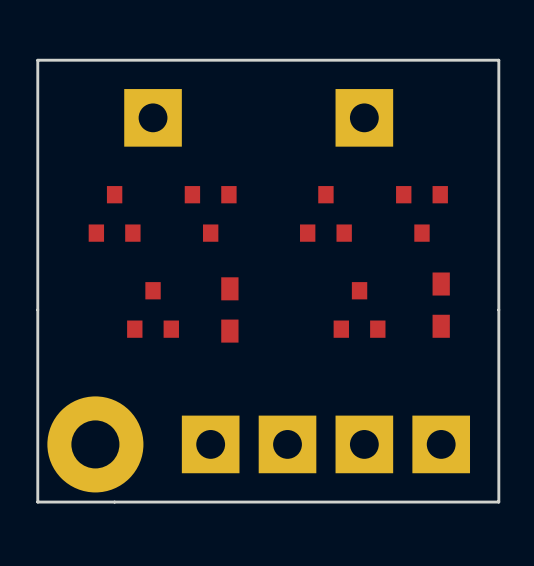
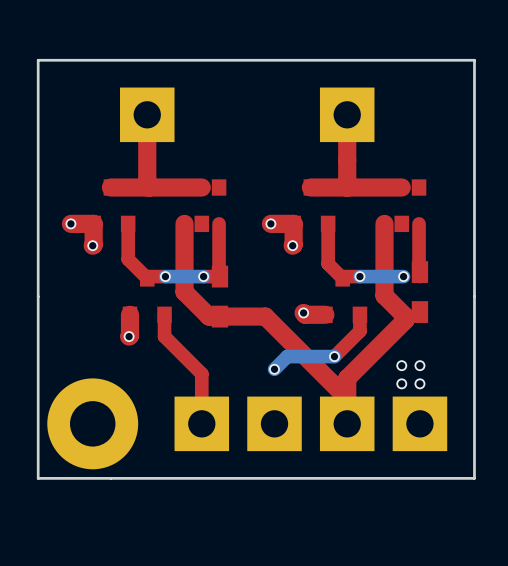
top track: none -> (147, 114) (147, 185) (149, 187)
top track: none -> (347, 114) (347, 187)
top track: none -> (201, 187) (110, 187)
top track: none -> (401, 187) (310, 187)
top track: none -> (70, 223) (93, 223) (92, 245)
via: none -> (70, 223)
top track: none -> (128, 223) (128, 259) (147, 278) (149, 276) (165, 276)
top track: none -> (184, 223) (184, 292) (209, 316) (265, 316) (347, 398)
top track: none -> (219, 223) (219, 276) (203, 276)
top track: none -> (270, 223) (293, 223) (292, 245)
via: none -> (270, 223)
top track: none -> (328, 223) (328, 263) (342, 278) (344, 276) (359, 276)
top track: none -> (384, 223) (384, 295) (405, 316) (405, 320) (347, 378) (347, 423)
top track: none -> (419, 223) (419, 276)
via: none -> (92, 245)
via: none -> (292, 245)
via: none -> (165, 276)
bottom track: none -> (203, 276) (165, 276)
via: none -> (203, 276)
via: none -> (359, 276)
bottom track: none -> (403, 276) (359, 276)
via: none -> (403, 276)
top track: none -> (303, 312) (305, 314) (325, 314)
via: none -> (303, 312)
top track: none -> (130, 314) (129, 336)
top track: none -> (164, 314) (164, 336) (201, 373) (201, 423)
top track: none -> (359, 314) (359, 331) (334, 356)
via: none -> (129, 336)
bottom track: none -> (334, 356) (287, 356) (274, 369)
via: none -> (334, 356)
via: none -> (401, 365)
via: none -> (419, 365)
via: none -> (274, 369)
via: none -> (401, 383)
via: none -> (419, 383)

